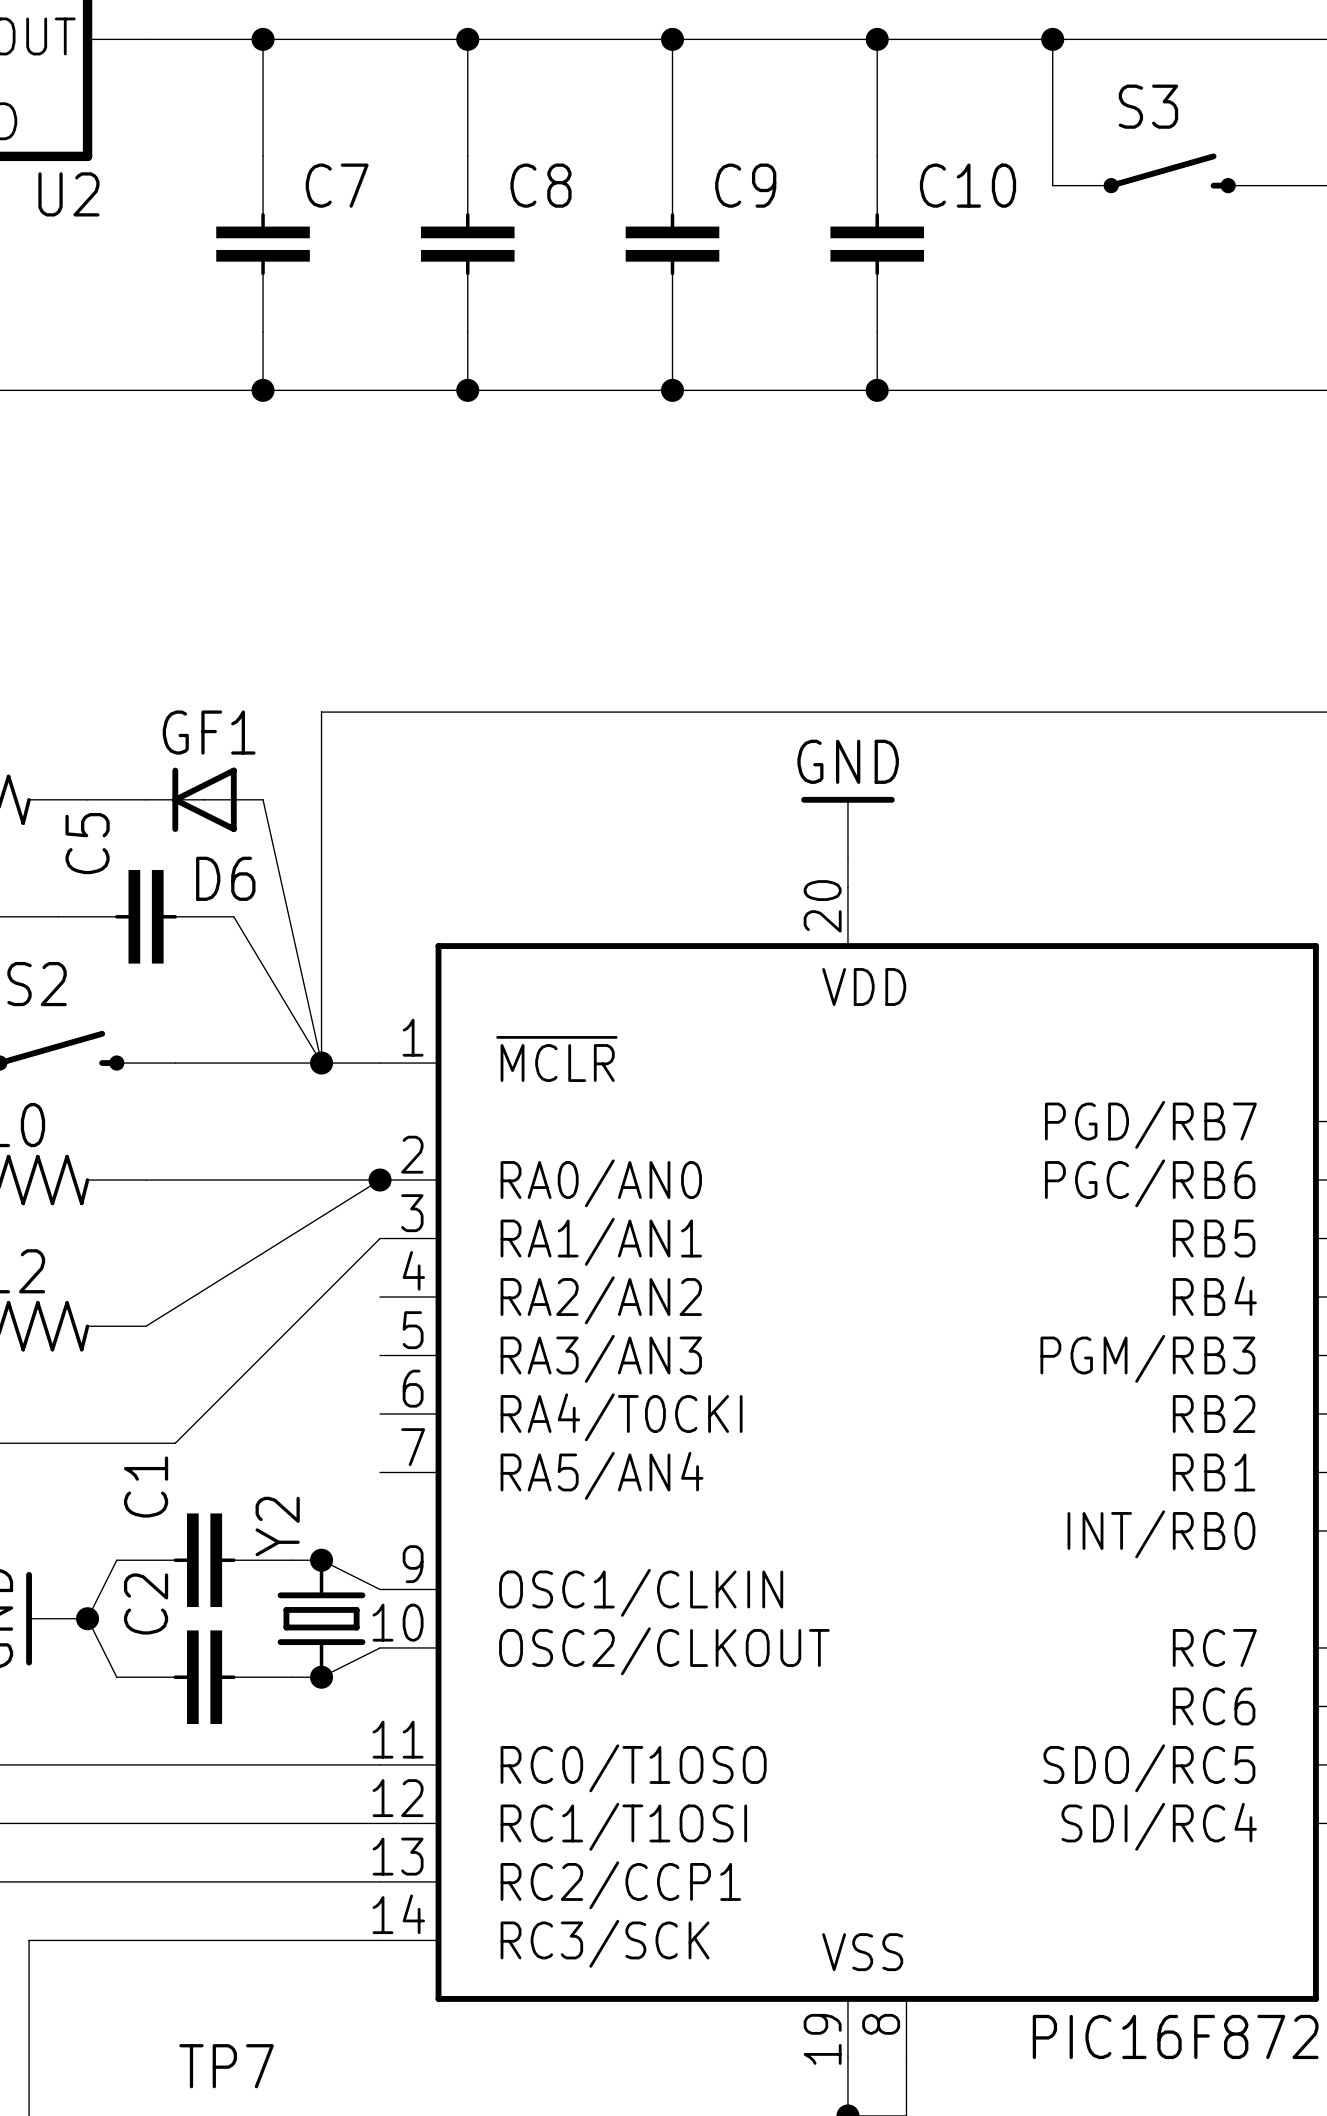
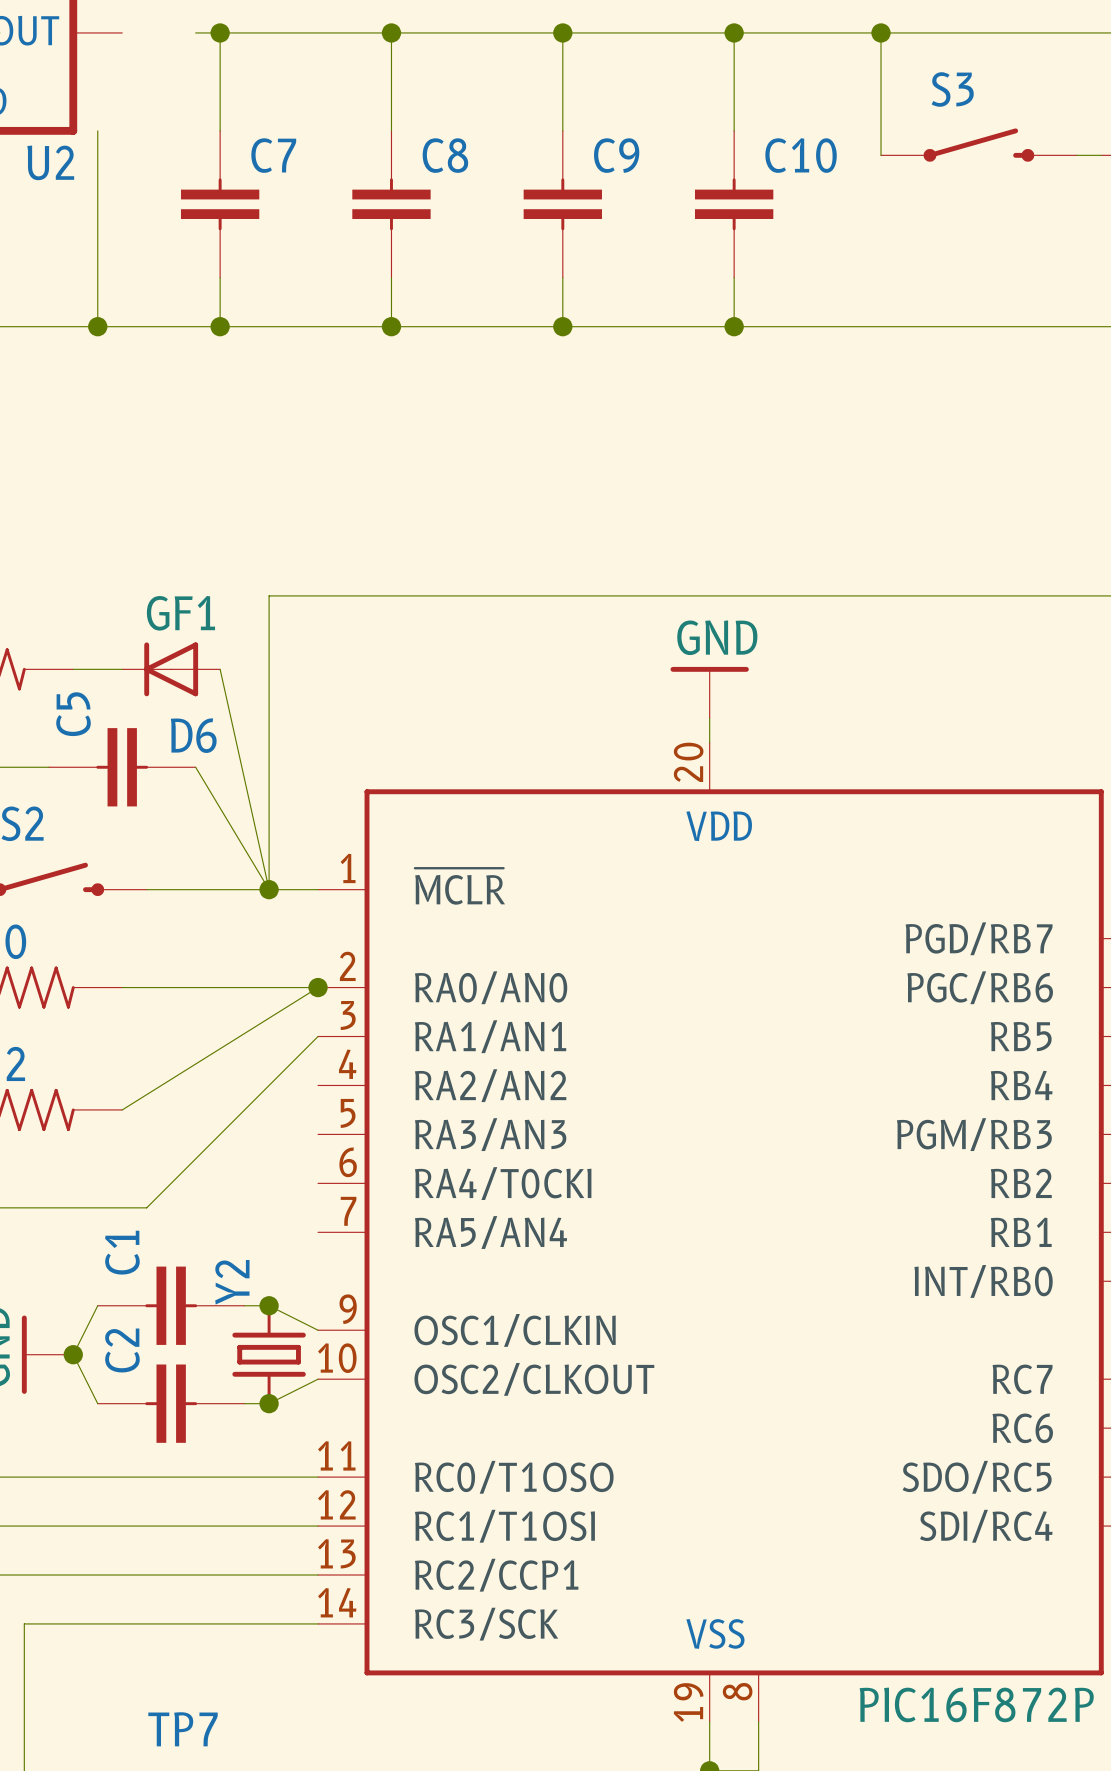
wire: (146, 39) (233, 39) -> none
wire: none -> (97, 130) (97, 326)
junction: none -> (97, 326)

